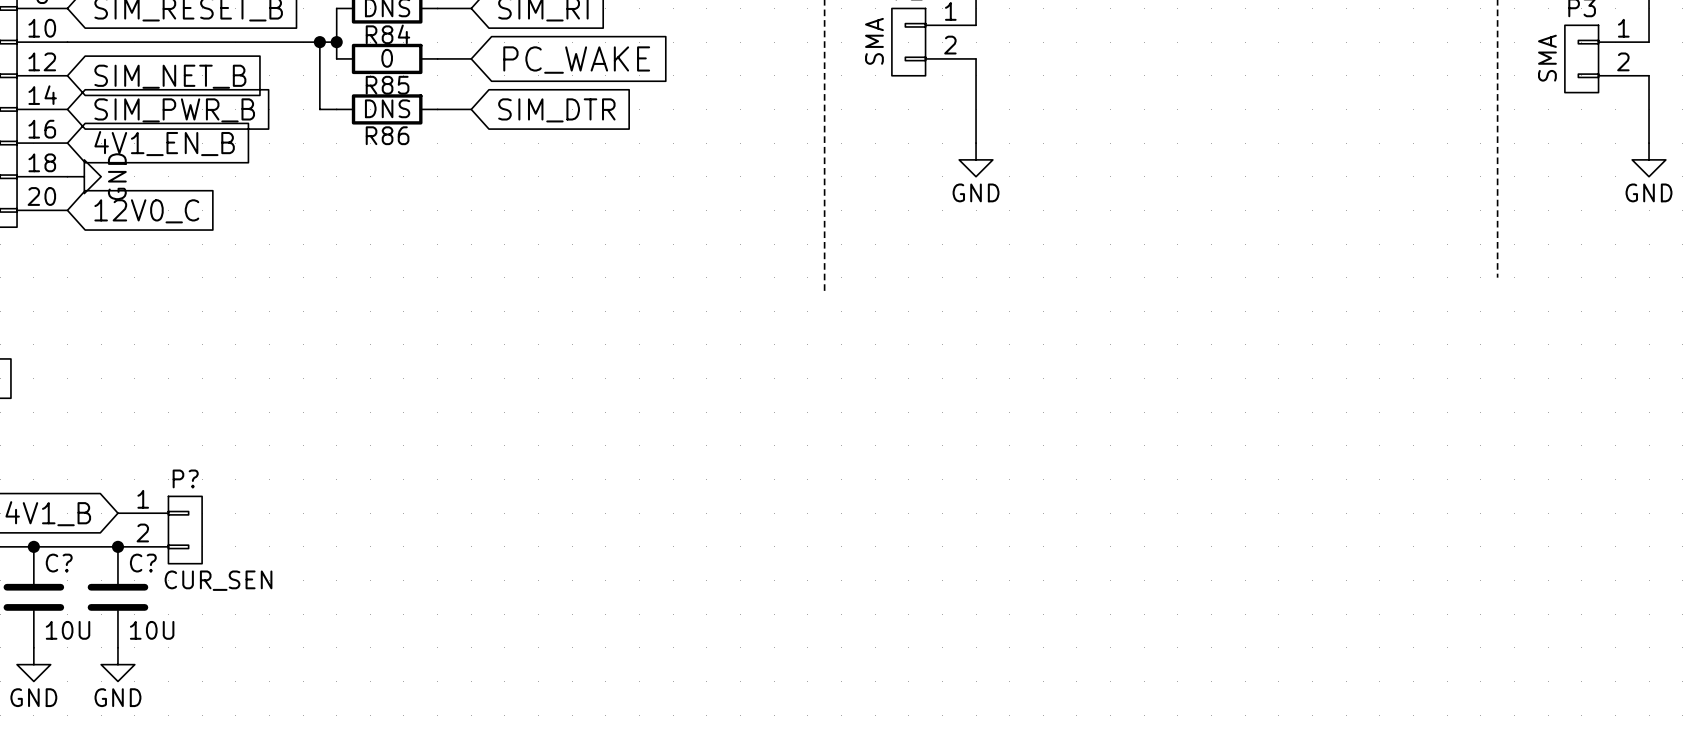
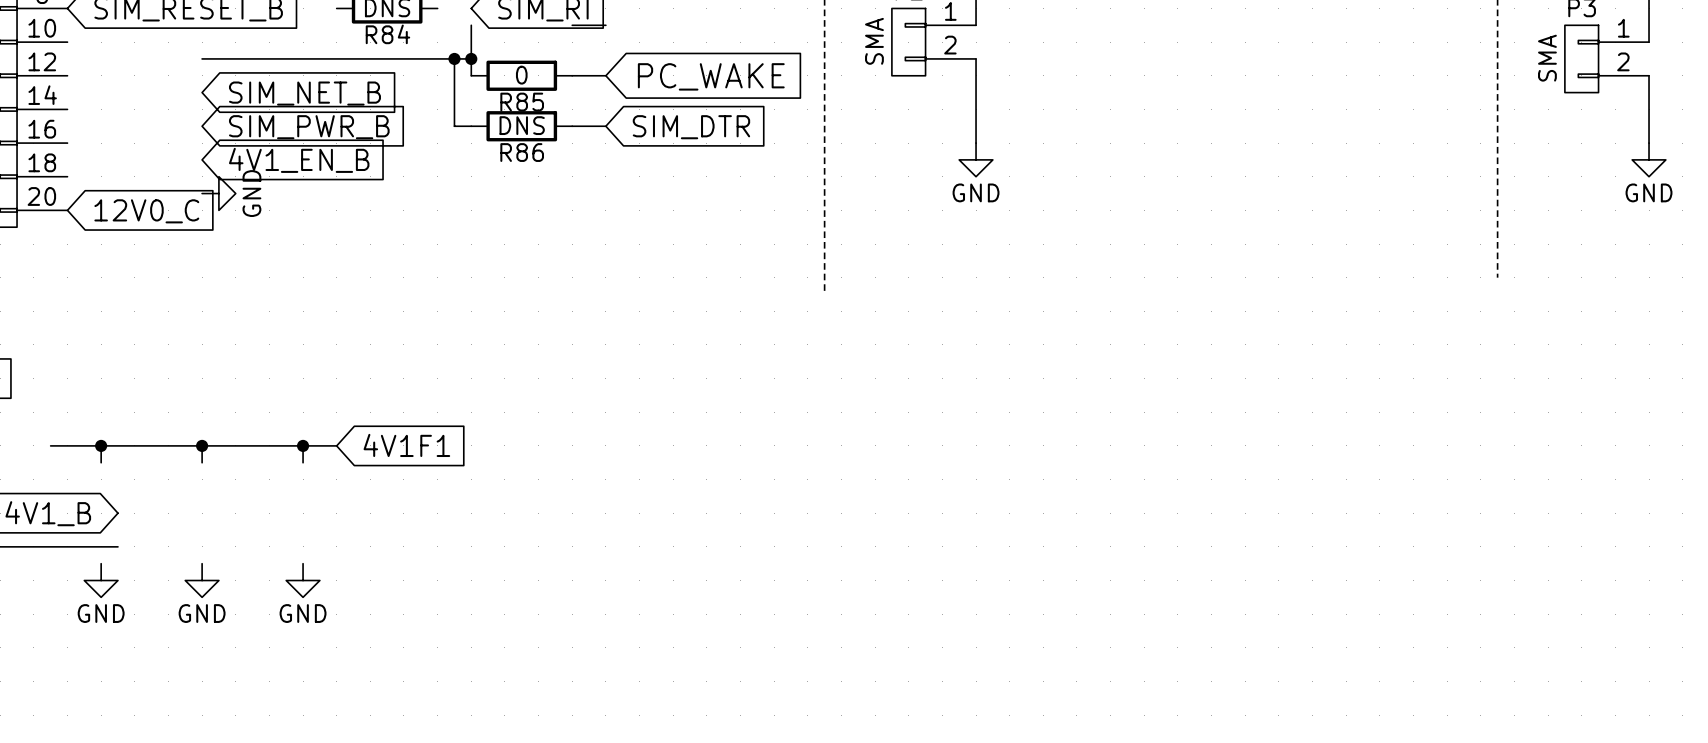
wire: (336, 8) (336, 58) -> (471, 25) (471, 75)
wire: (437, 8) (471, 8) -> (572, 25) (605, 25)
wire: (67, 42) (336, 42) -> none
wire: (319, 42) (319, 109) (336, 109) -> (454, 58) (454, 126) (471, 126)
junction: (319, 42) -> none
junction: (336, 42) -> none
wire: none -> (202, 58) (437, 58)
R85 position: (387, 58) -> (521, 75)
junction: none -> (454, 58)
junction: none -> (471, 58)
global label position: PC_WAKE (576, 60) -> PC_WAKE (711, 76)
wire: none -> (572, 75) (605, 75)
global label position: SIM_NET_B (170, 76) -> SIM_NET_B (304, 93)
R86 position: (387, 109) -> (521, 126)
wire: (437, 109) (471, 109) -> (572, 126) (605, 126)
global label position: SIM_PWR_B (174, 110) -> SIM_PWR_B (309, 127)
global label position: SIM_DTR (556, 110) -> SIM_DTR (691, 127)
global label position: 4V1_EN_B (164, 143) -> 4V1_EN_B (299, 160)
power symbol: GND (84, 176) -> none
power symbol: none -> GND (218, 193)
wire: none -> (50, 445) (336, 445)
wire: none -> (101, 445) (101, 462)
junction: none -> (101, 445)
wire: none -> (202, 445) (202, 462)
junction: none -> (202, 445)
wire: none -> (303, 445) (303, 462)
junction: none -> (303, 445)
global label: none -> 4V1F1 (406, 445)
P?: CUR_SEN (160, 530) -> none
junction: (33, 546) -> none
junction: (117, 546) -> none
power symbol: none -> GND (101, 580)
power symbol: none -> GND (202, 580)
power symbol: none -> GND (303, 580)
C?: 10U (33, 597) -> none
C?: 10U (117, 597) -> none
power symbol: GND (33, 664) -> none
power symbol: GND (117, 664) -> none

